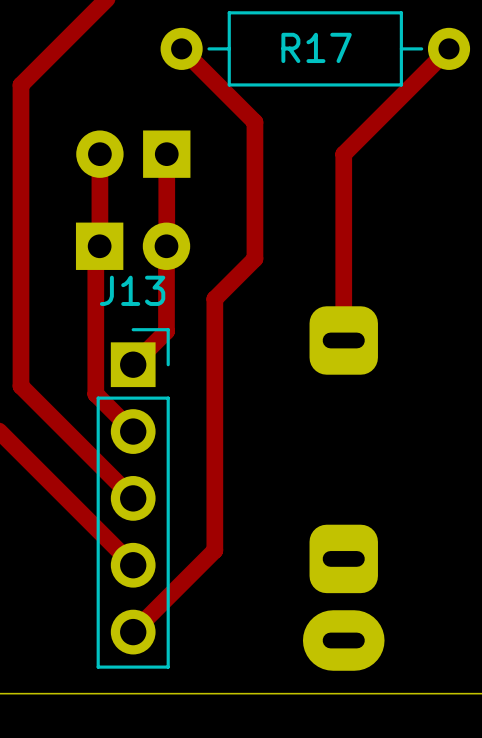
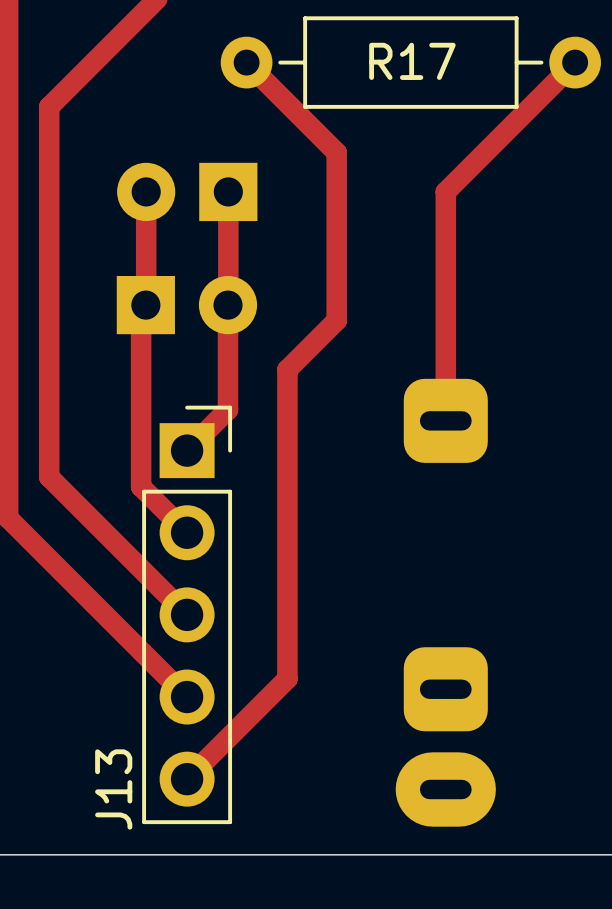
J13 name rotation: 0° (132, 290) -> 90° counterclockwise (113, 789)
J13 name position: J13 (132, 290) -> J13 (113, 789)

